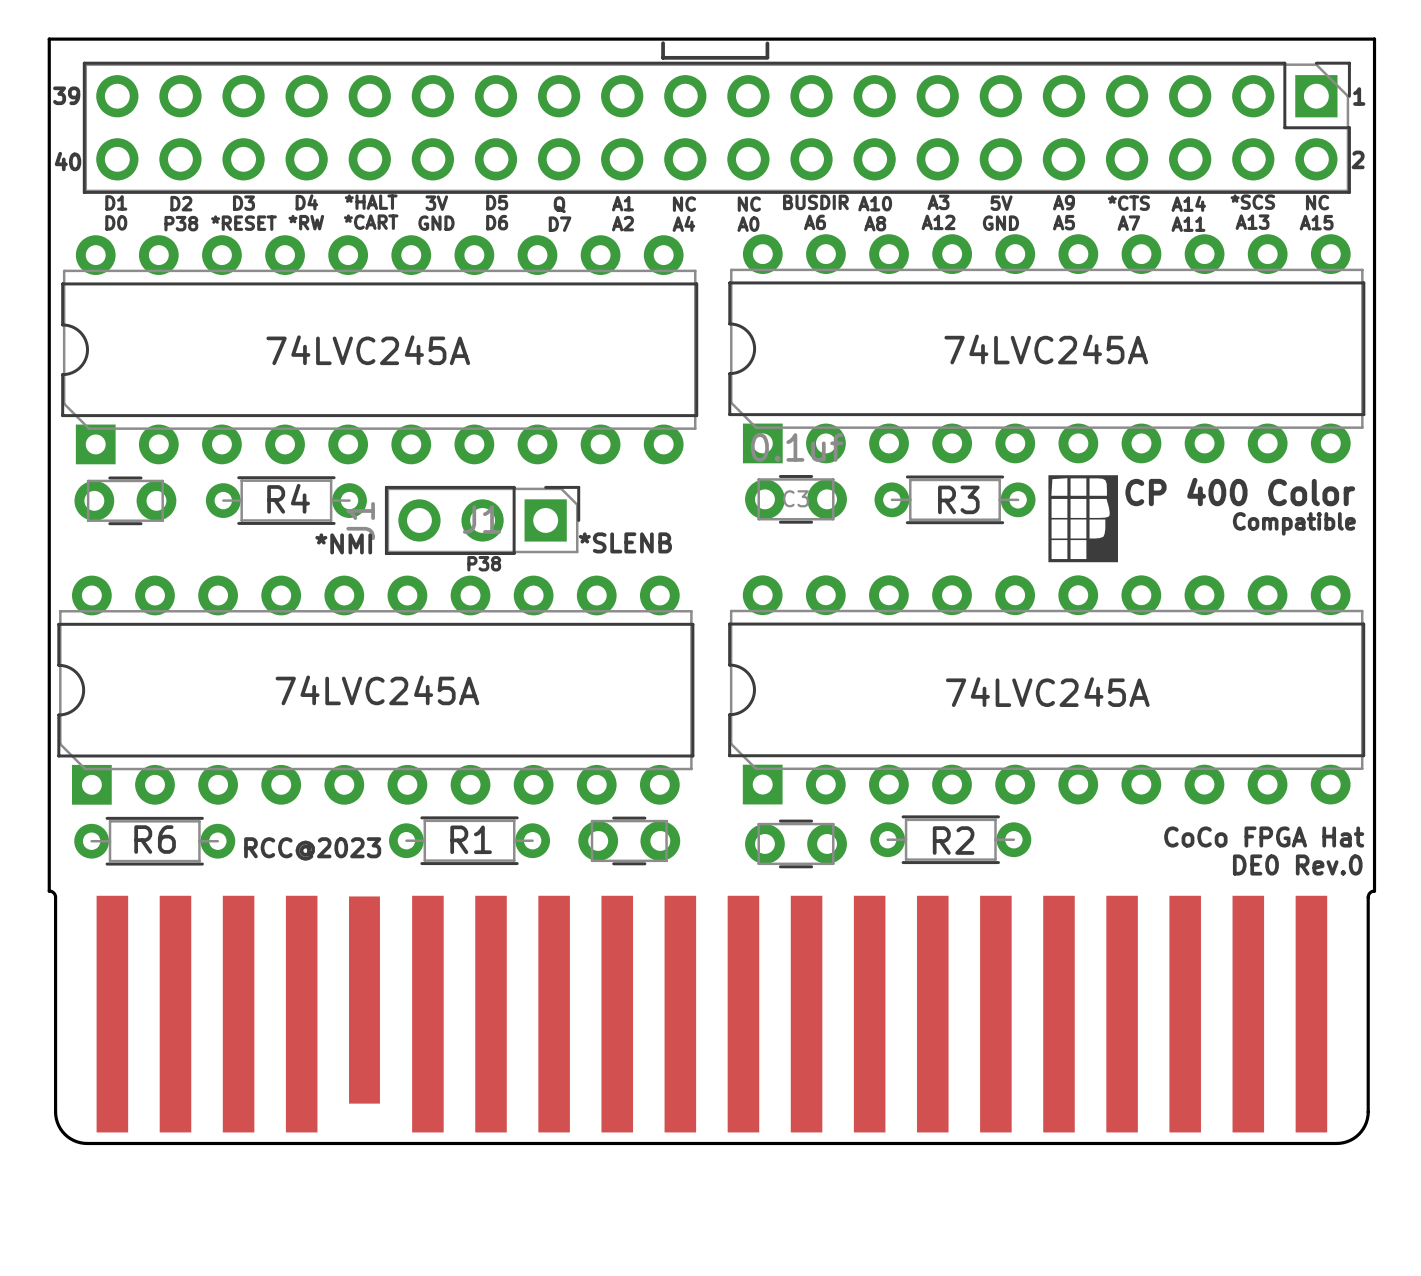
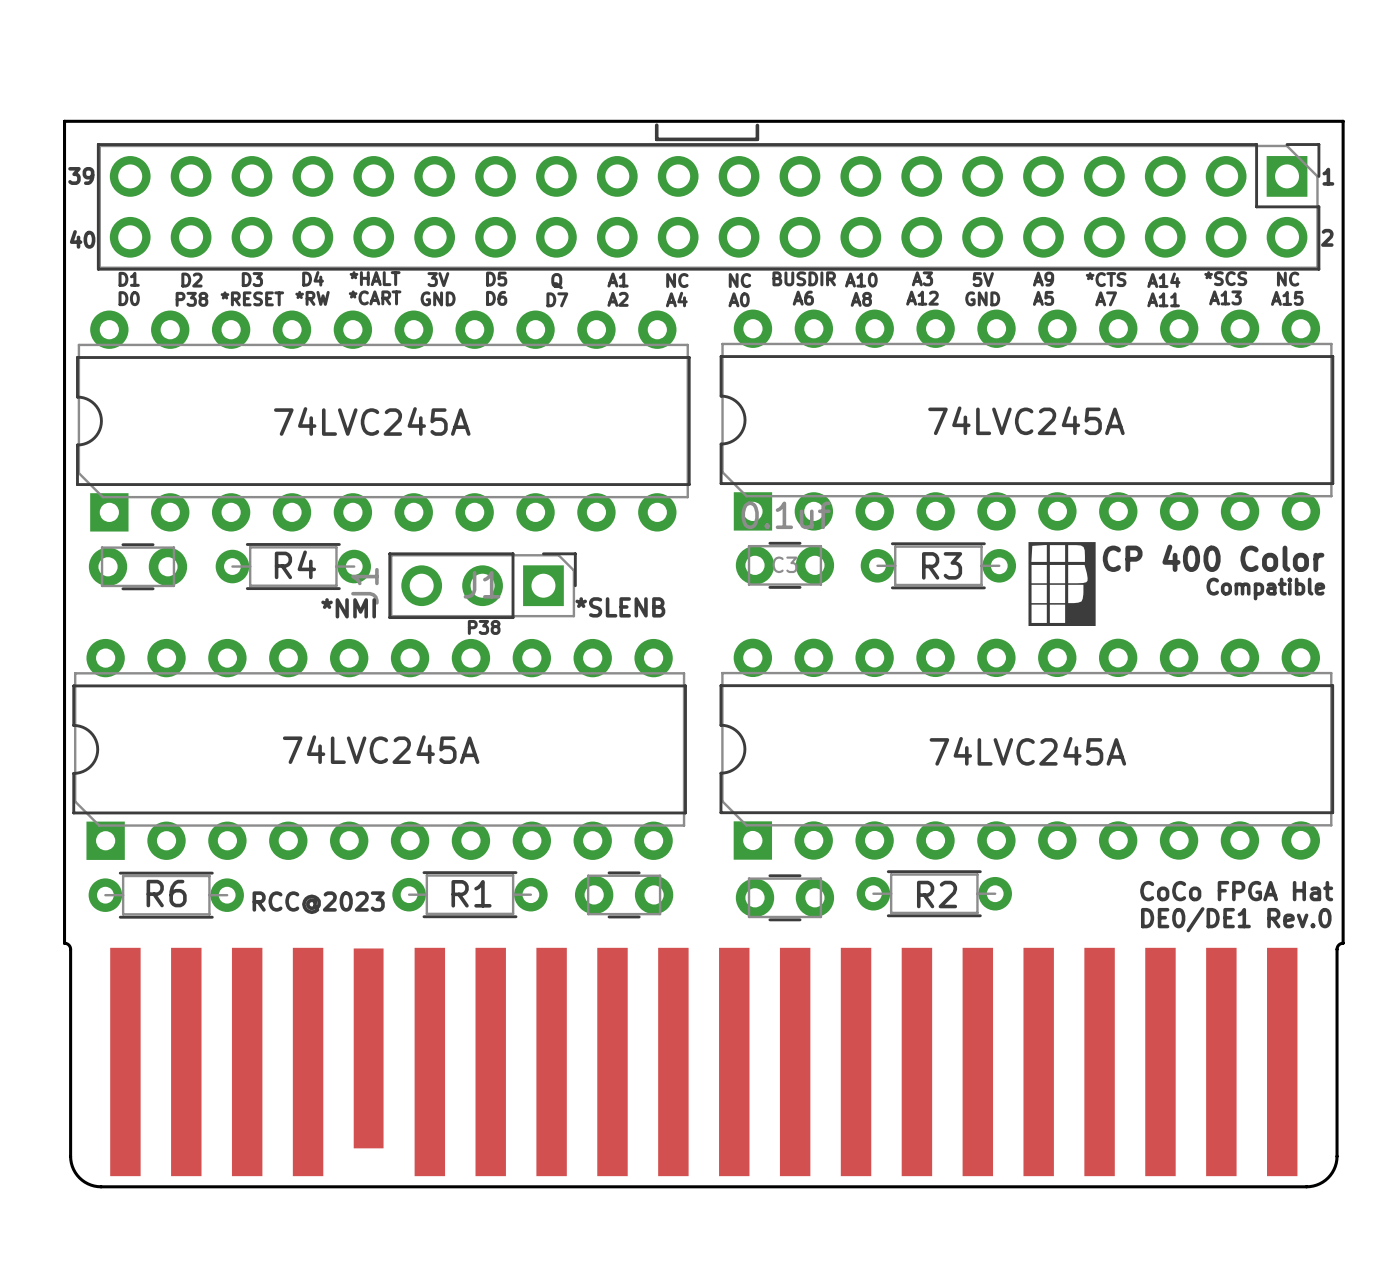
text: DE0 Rev.0 (1297, 864) -> DE0/DE1 Rev.0 (1236, 919)

